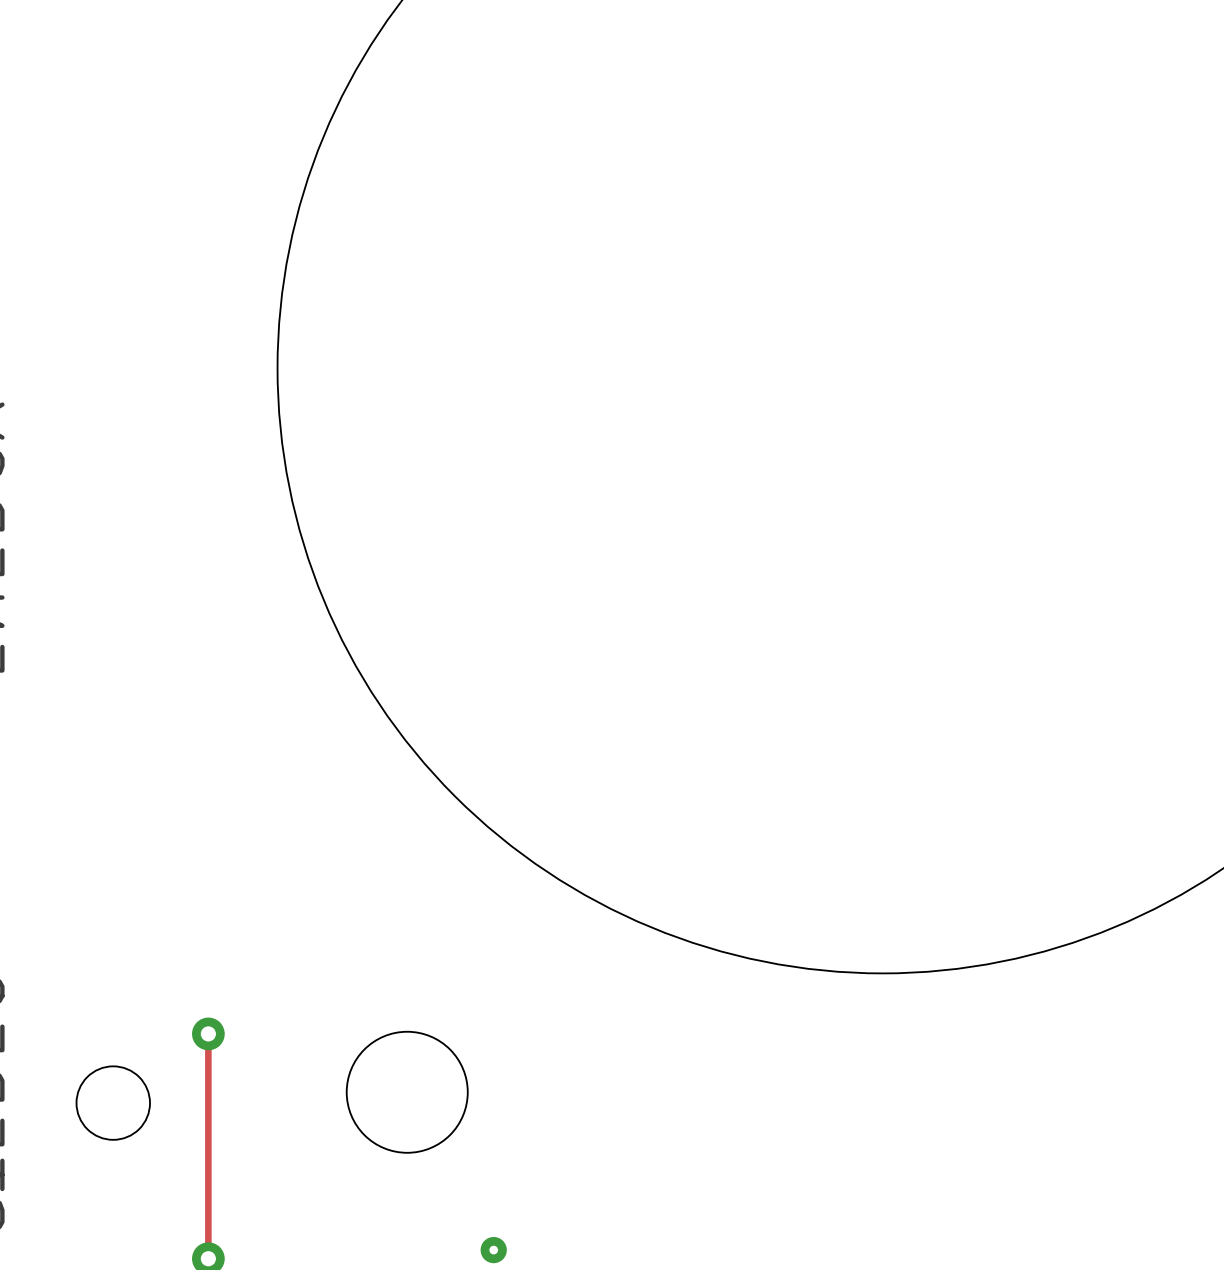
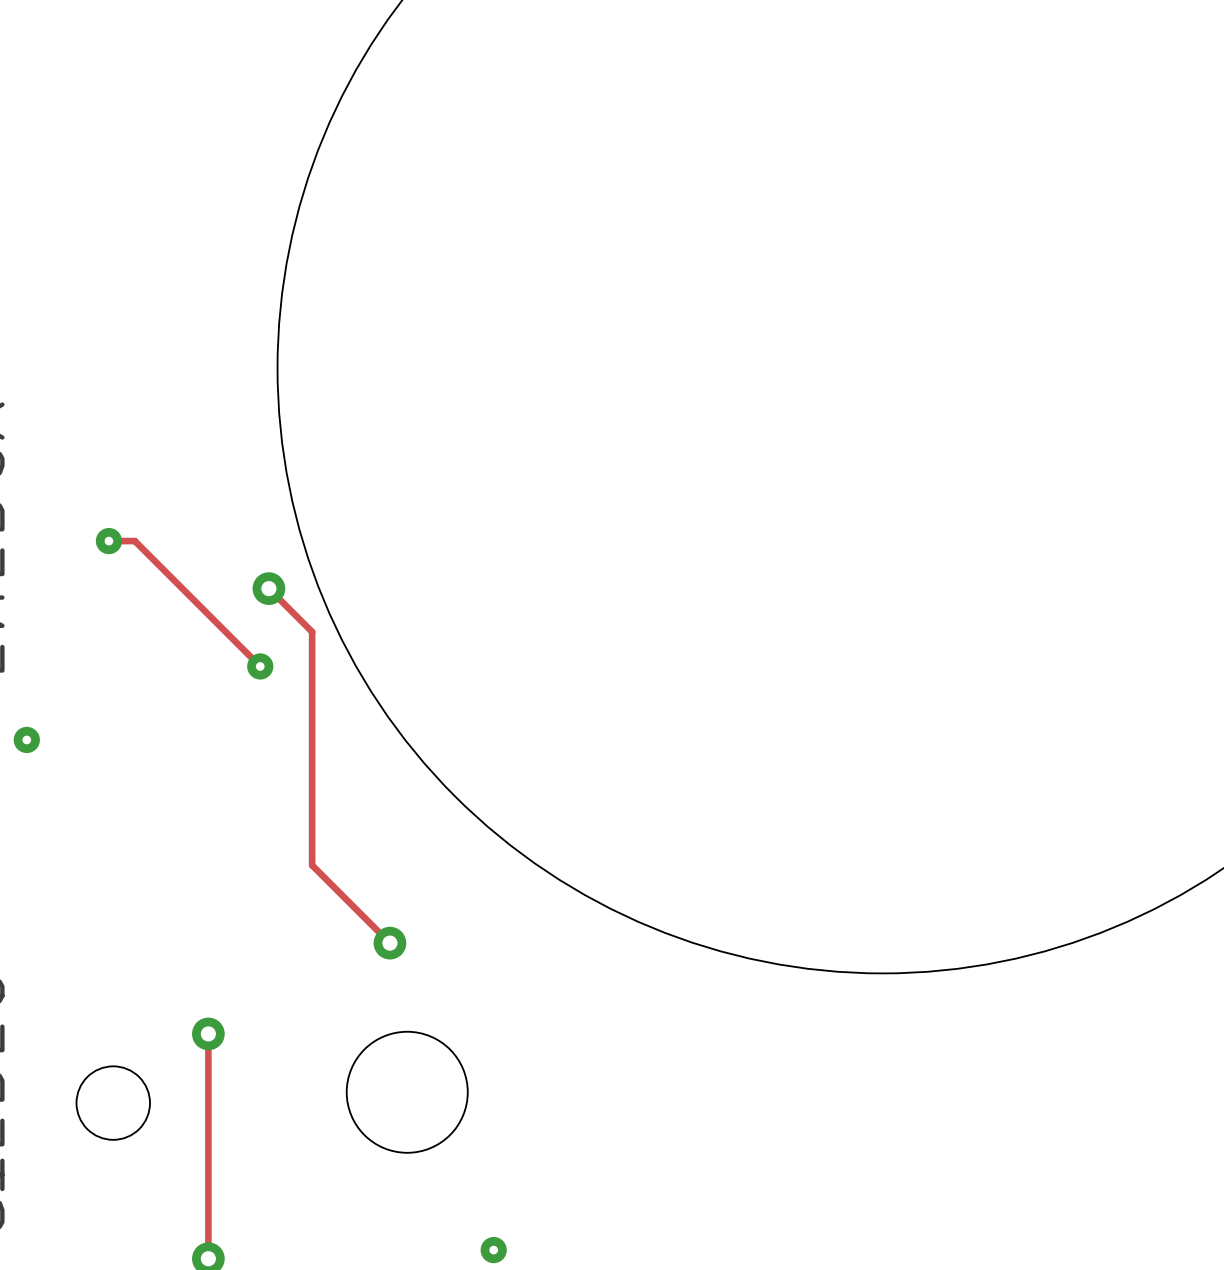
track: none -> (108, 541) (134, 541) (260, 666)
via: none -> (108, 541)
track: none -> (268, 588) (312, 631) (312, 865) (389, 943)
via: none -> (268, 588)
via: none -> (260, 666)
via: none -> (26, 739)
via: none -> (389, 943)

